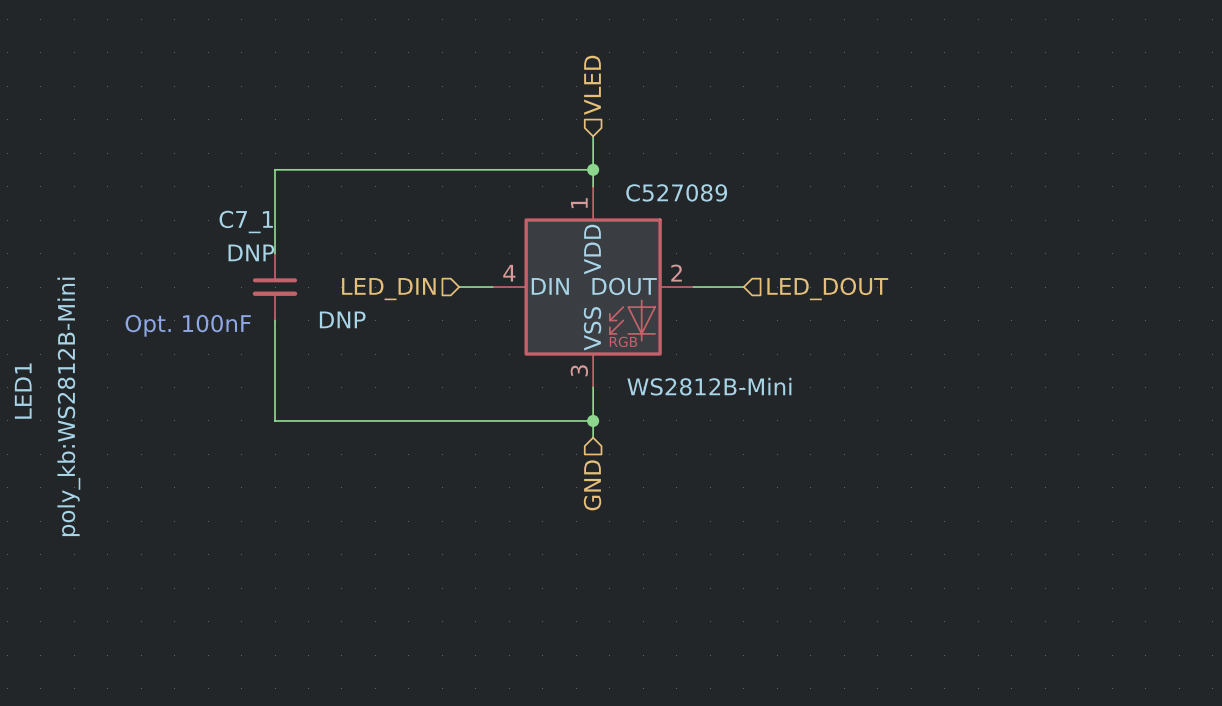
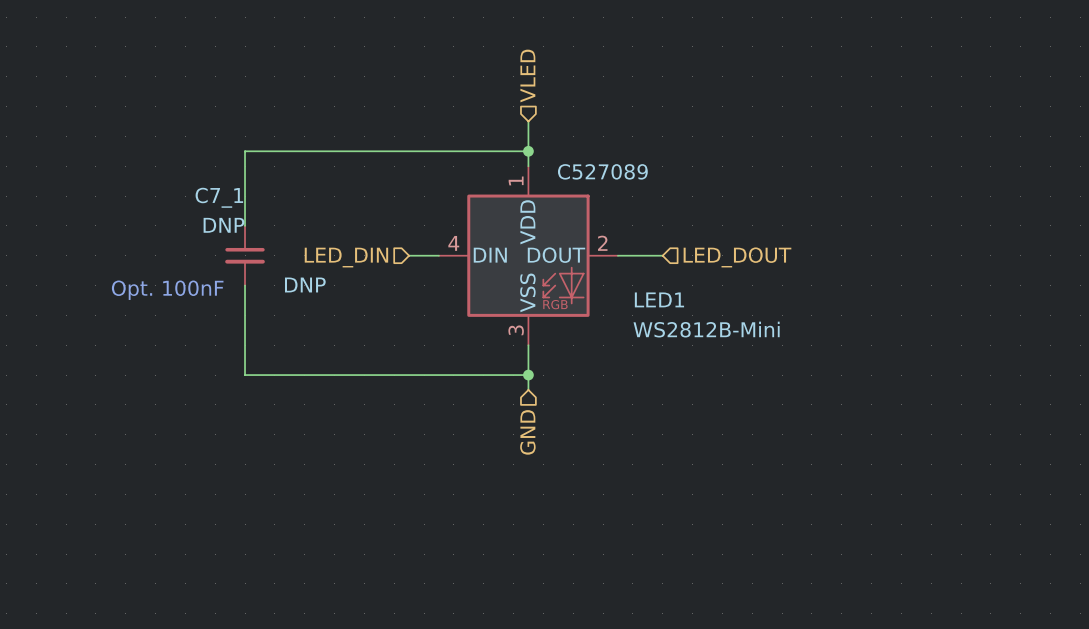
LED1 value position: WS2812B-Mini (709, 386) -> WS2812B-Mini (706, 329)
LED1 name rotation: 0° (23, 391) -> 90° clockwise (659, 299)
LED1 name position: LED1 (23, 391) -> LED1 (659, 299)
LED1 text: poly_kb:WS2812B-Mini (68, 406) -> none

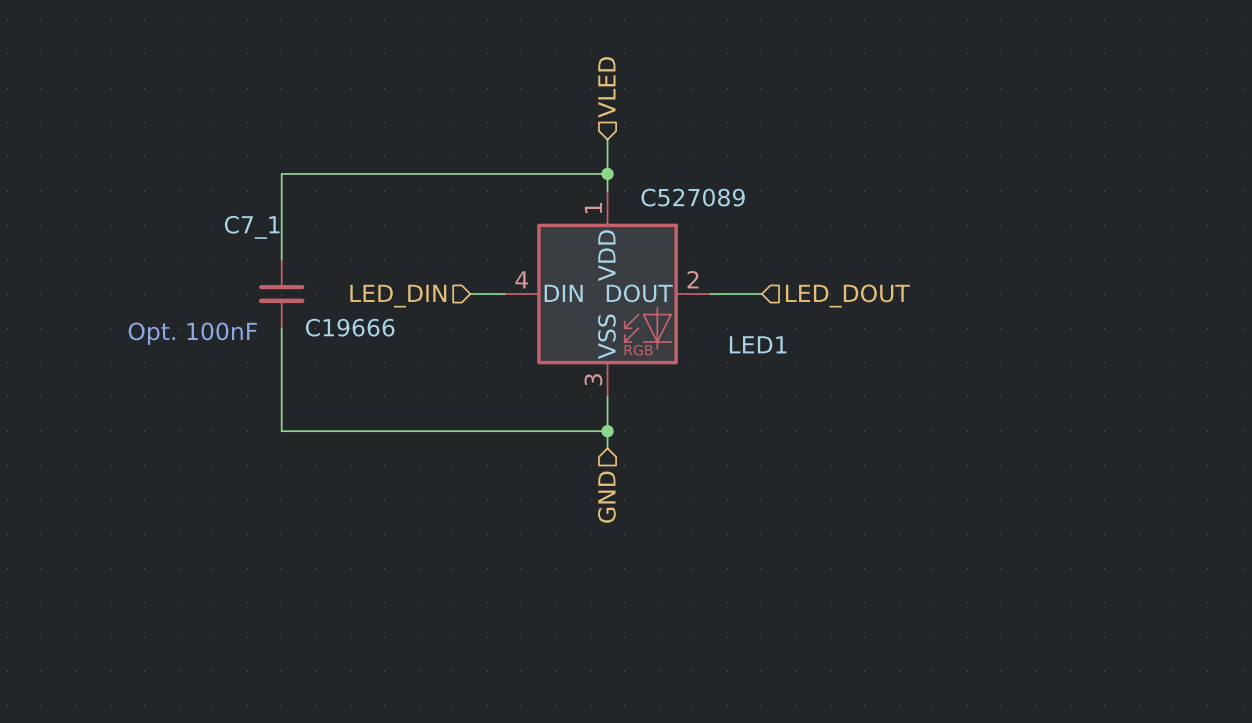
C7_1 value: DNP (223, 225) -> none
C7_1 text: DNP (305, 284) -> C19666 (350, 327)
LED1 value: WS2812B-Mini (706, 329) -> none

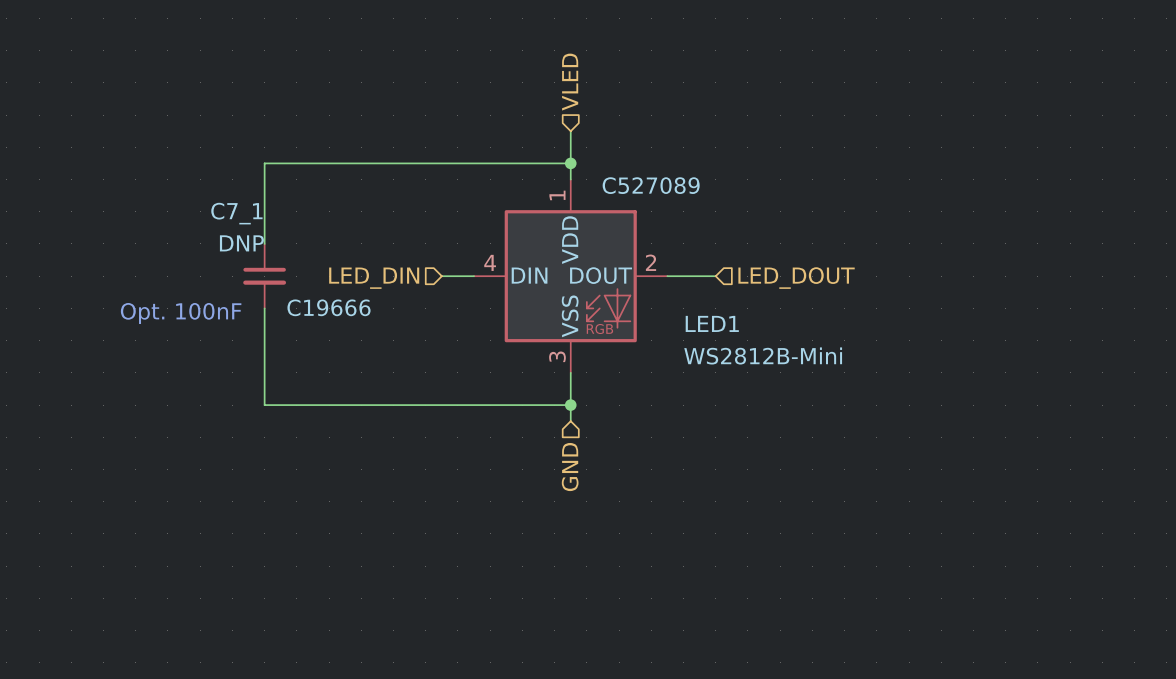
C7_1 value: none -> DNP (241, 243)
LED1 value: none -> WS2812B-Mini (763, 355)

